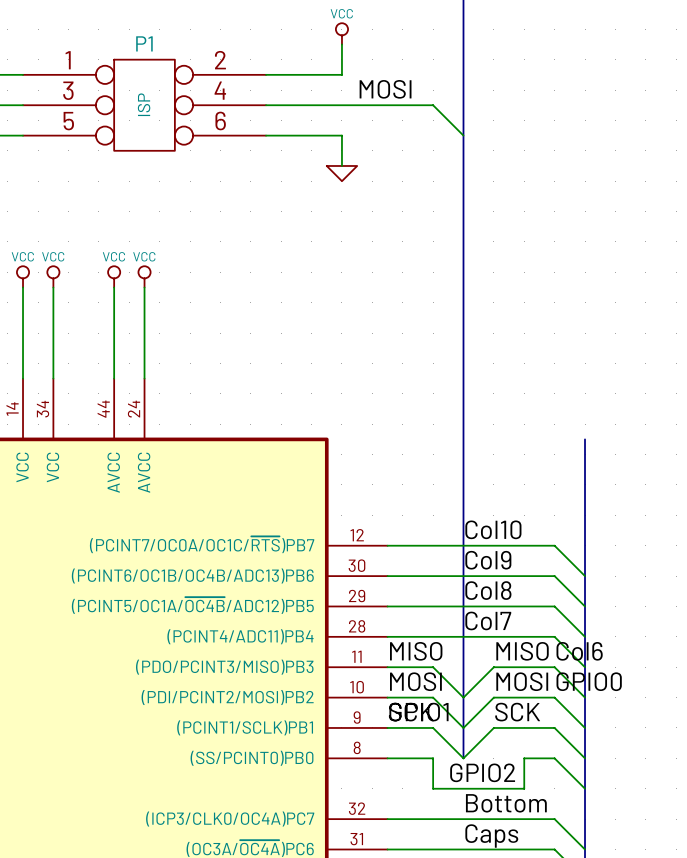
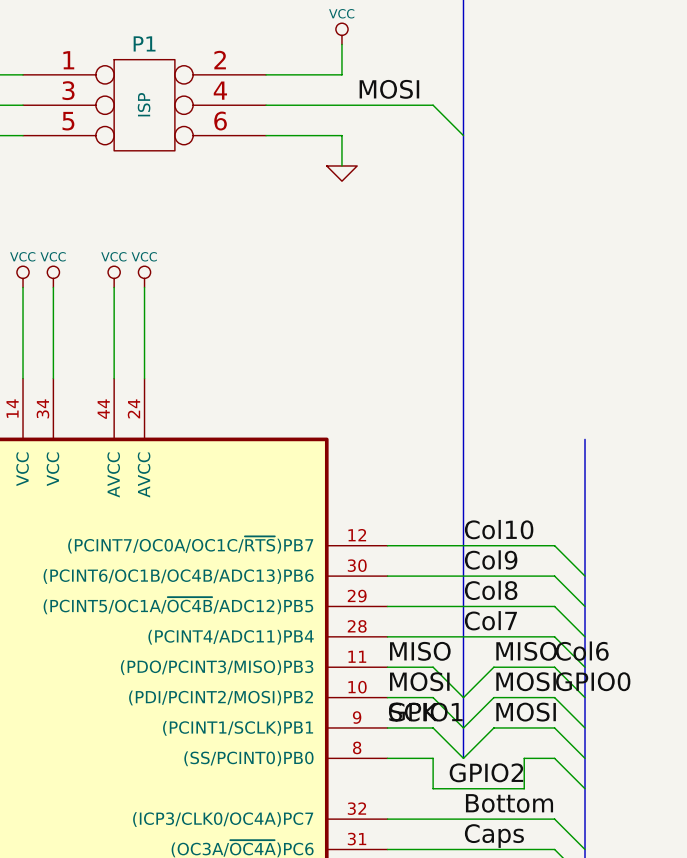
label: SCK (517, 712) -> MOSI (526, 712)

